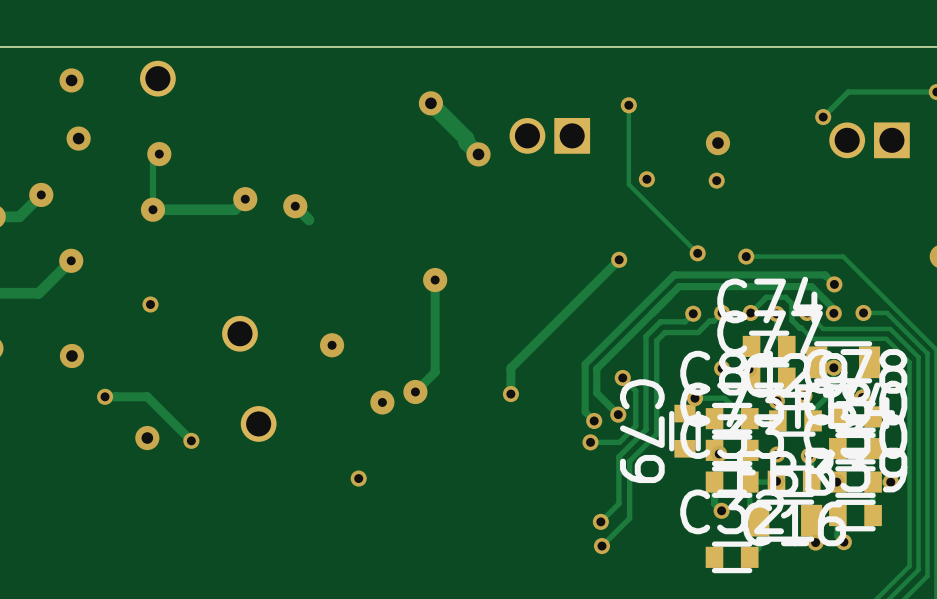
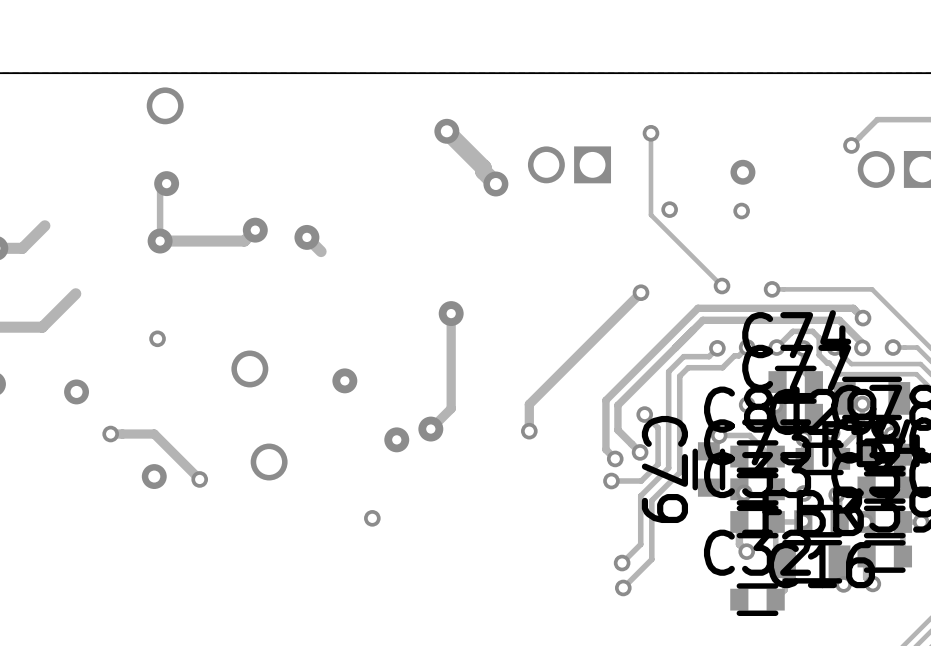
via: (71, 80) -> none
via: (78, 138) -> none
via: (41, 194) -> none
via: (71, 260) -> none

